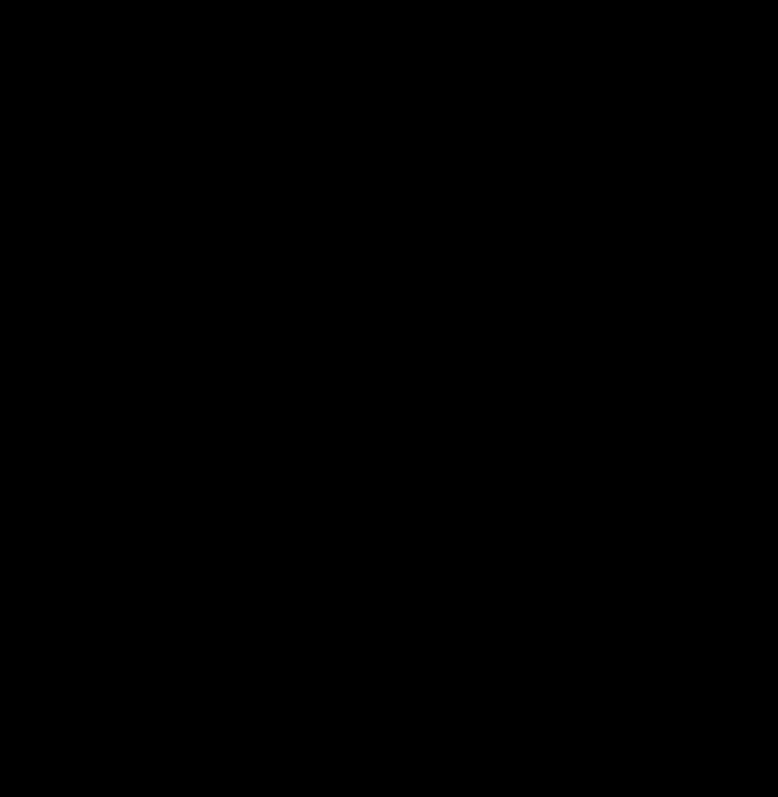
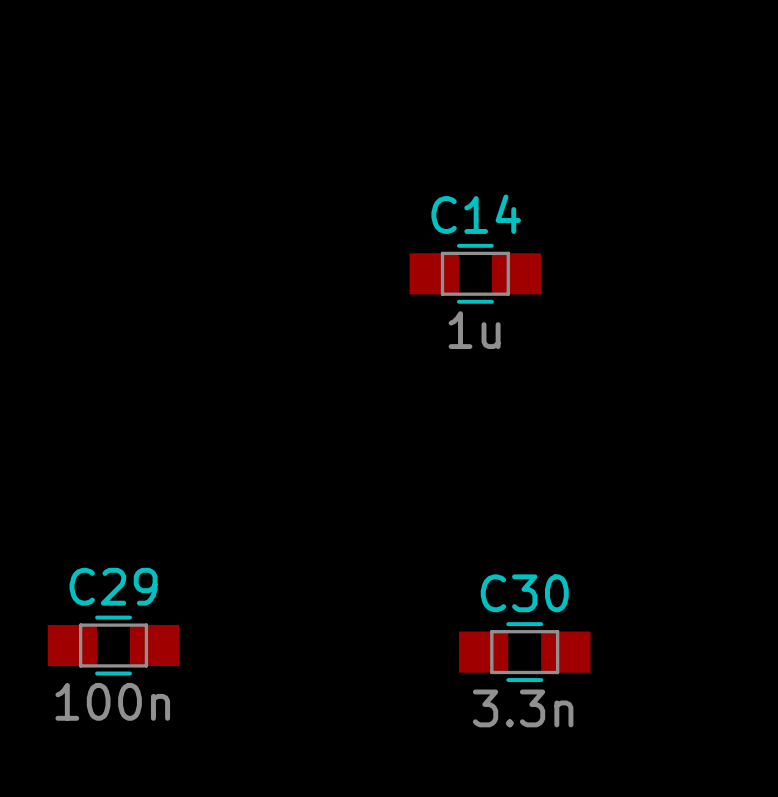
C14: none -> 1u (475, 273)
C29: none -> 100n (113, 645)
C30: none -> 3.3n (524, 652)

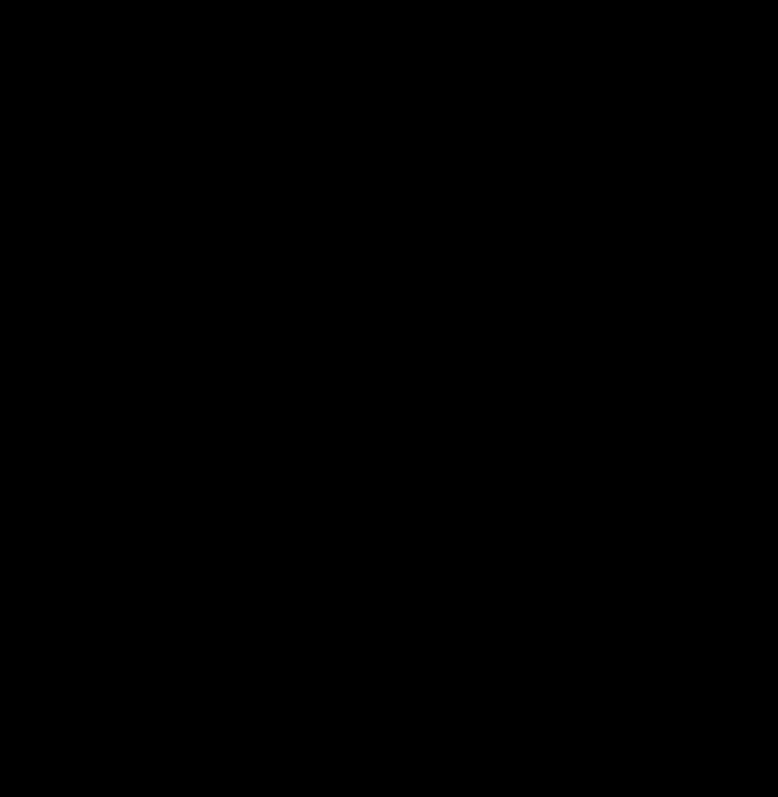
C14: 1u (475, 273) -> none
C29: 100n (113, 645) -> none
C30: 3.3n (524, 652) -> none

